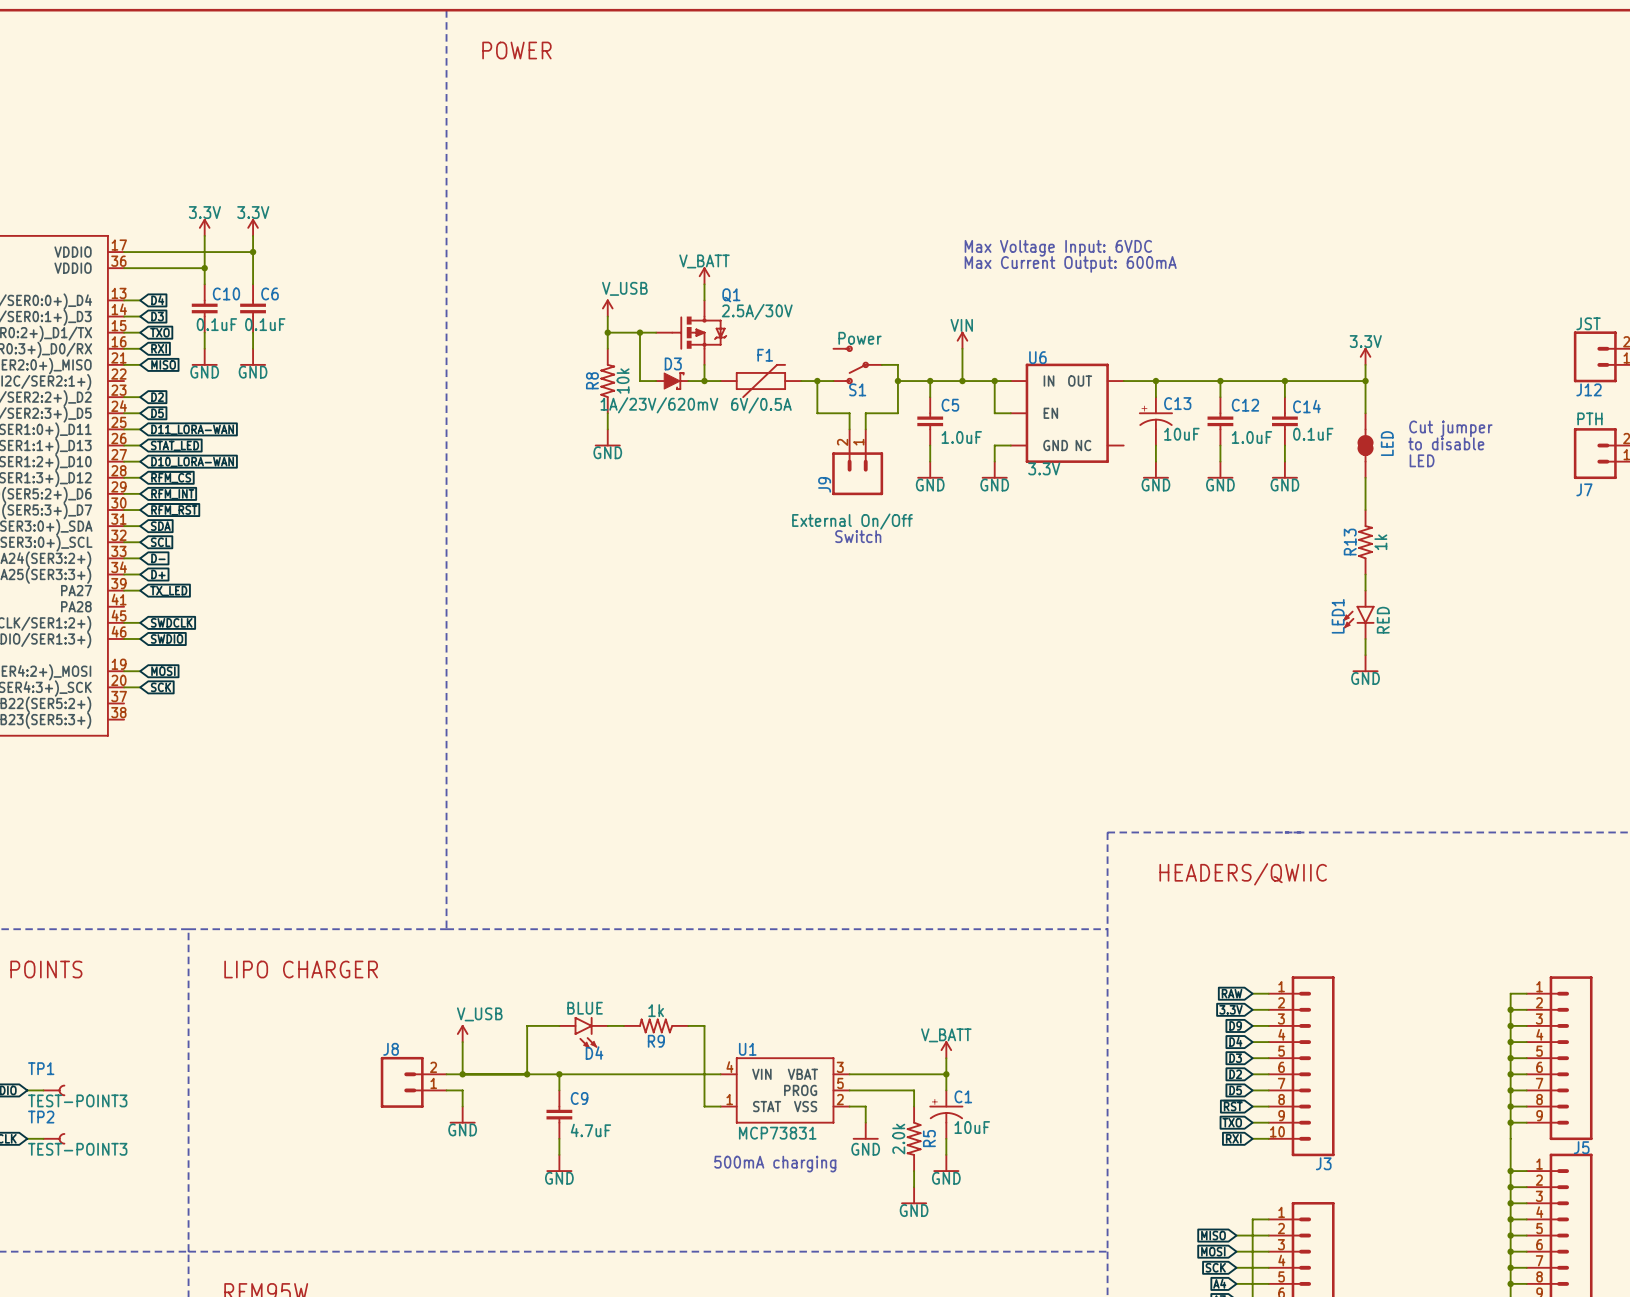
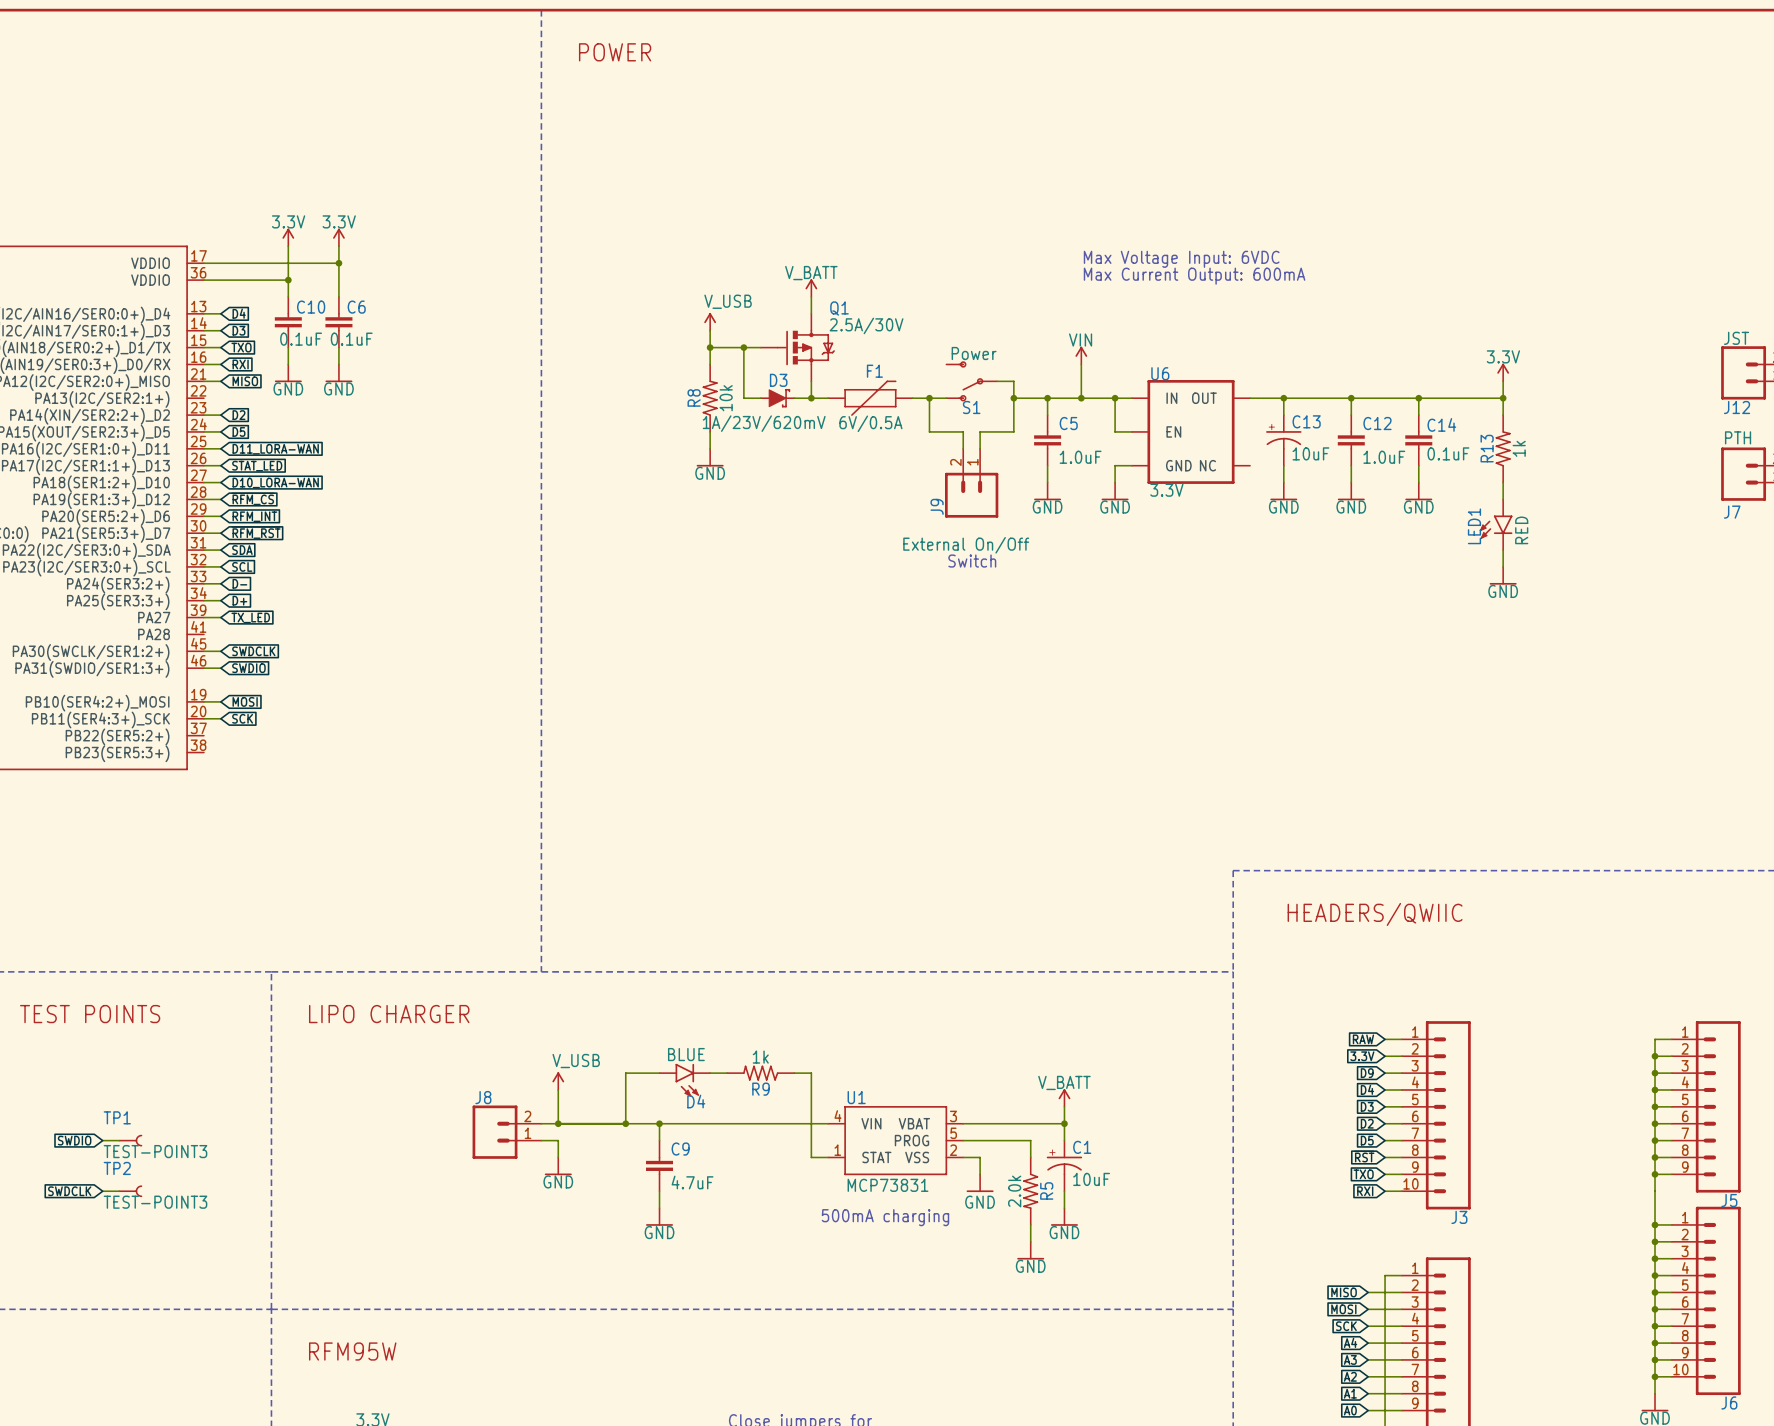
text: Cut jumper (1450, 428) -> none
text: to disable (1446, 443) -> none
LED: (1365, 445) -> none
text: LED (1422, 460) -> none
R13 position: (1365, 542) -> (1503, 448)
wire: (1365, 574) (1365, 590) -> (1503, 550) (1503, 566)
LED1 position: (1358, 614) -> (1496, 524)
wire: (1365, 638) (1365, 655) -> none
power symbol position: GND (1365, 663) -> GND (1503, 575)

